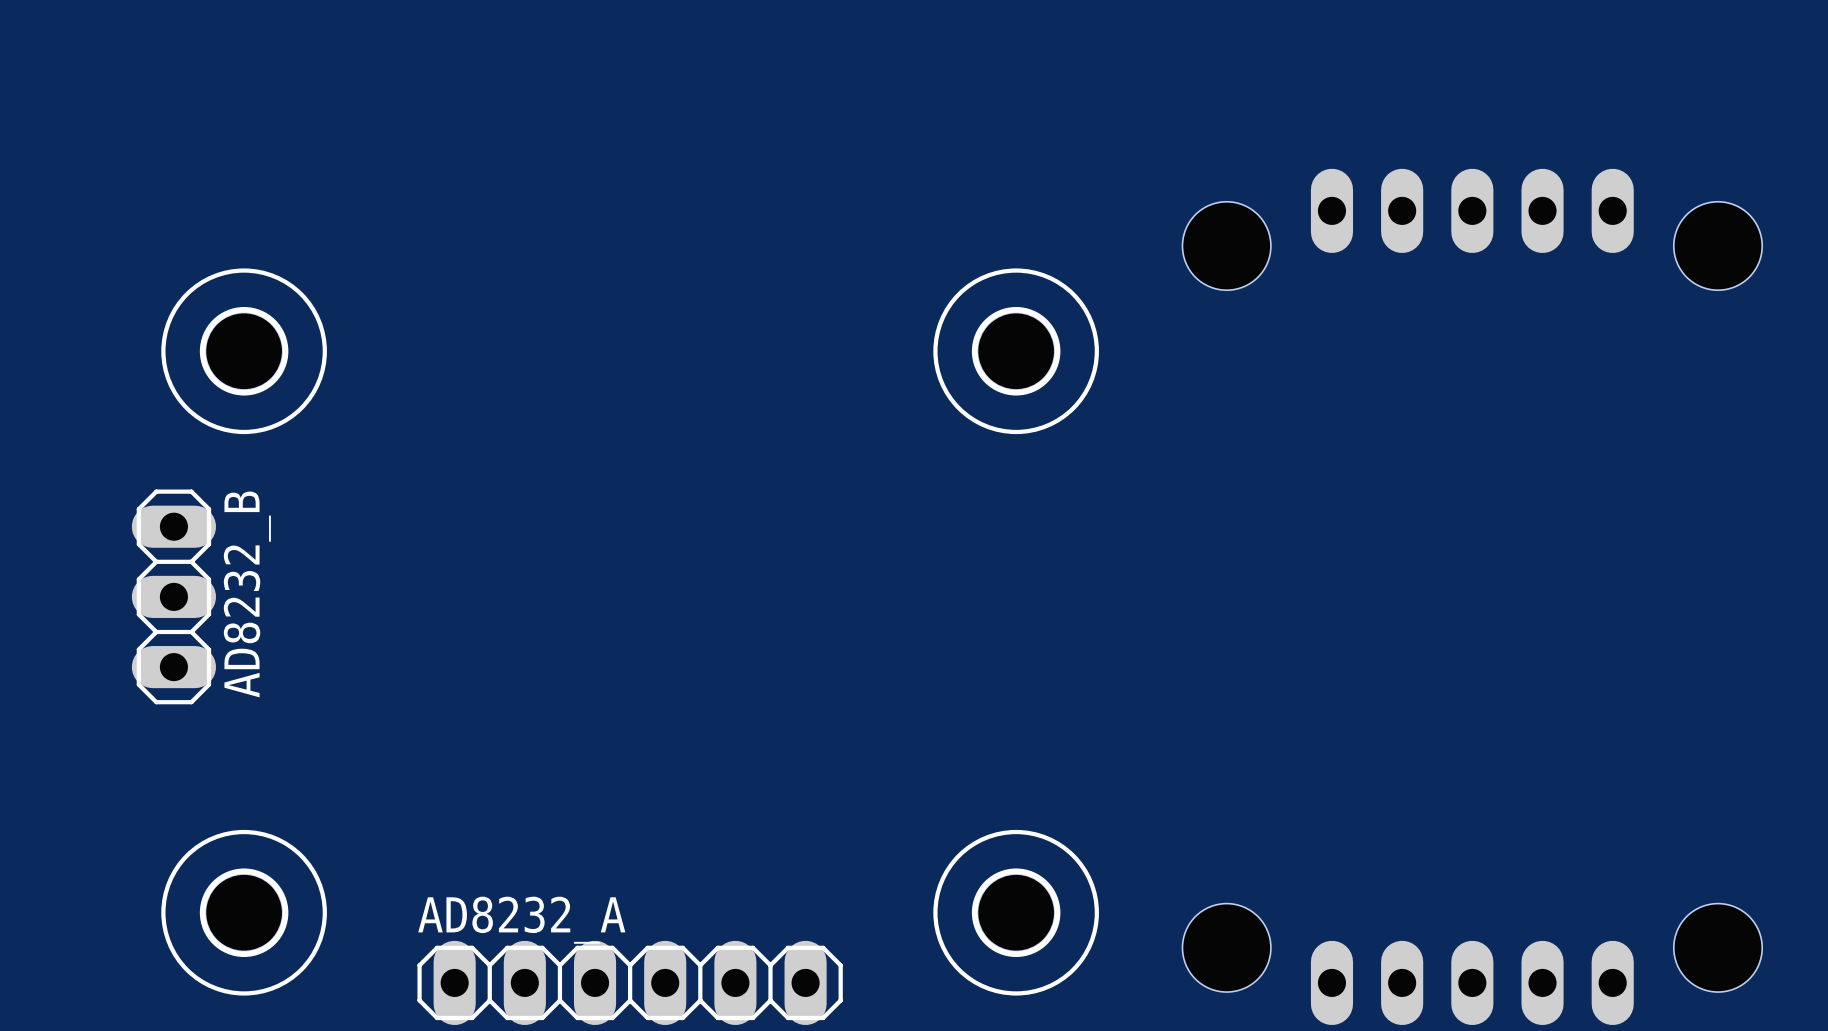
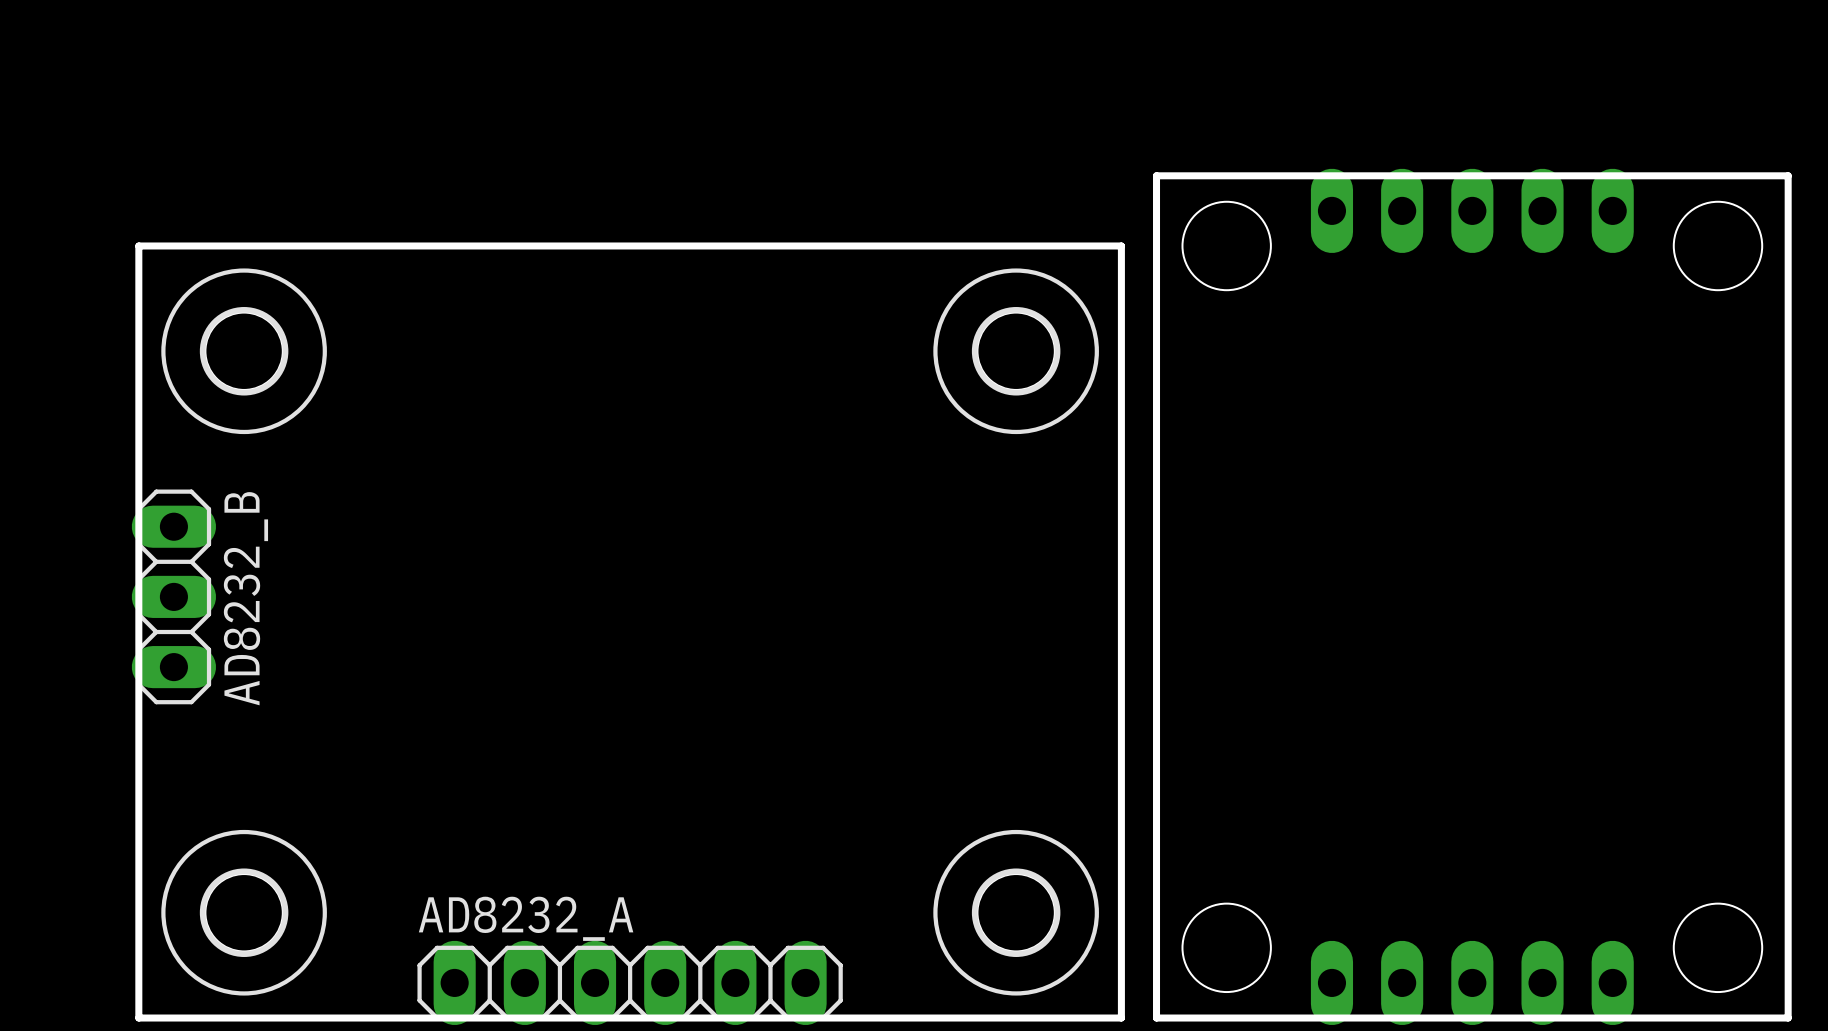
board edge: none -> (1156, 175) (1156, 1018) (1788, 1018) (1788, 175) (1156, 175)
board edge: none -> (138, 245) (1121, 245) (1121, 1018) (138, 1018) (138, 245)

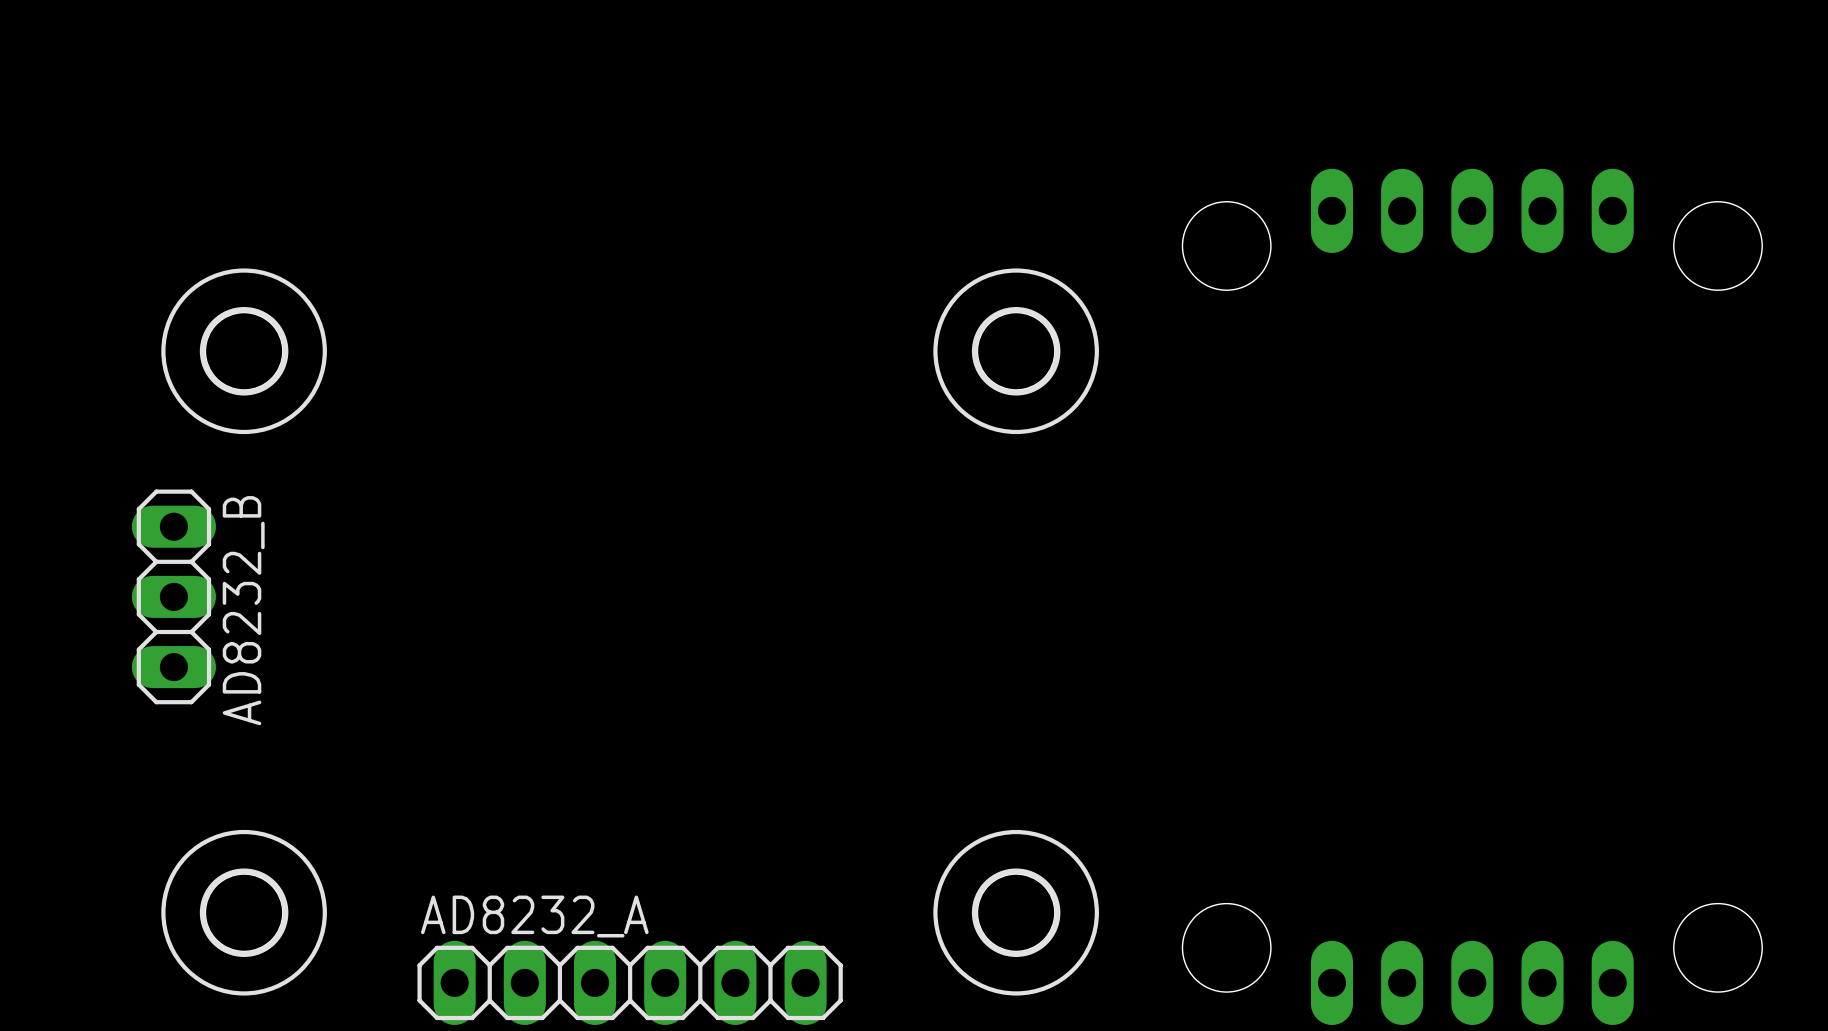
board edge: (1156, 175) (1156, 1018) (1788, 1018) (1788, 175) (1156, 175) -> none
board edge: (138, 245) (1121, 245) (1121, 1018) (138, 1018) (138, 245) -> none

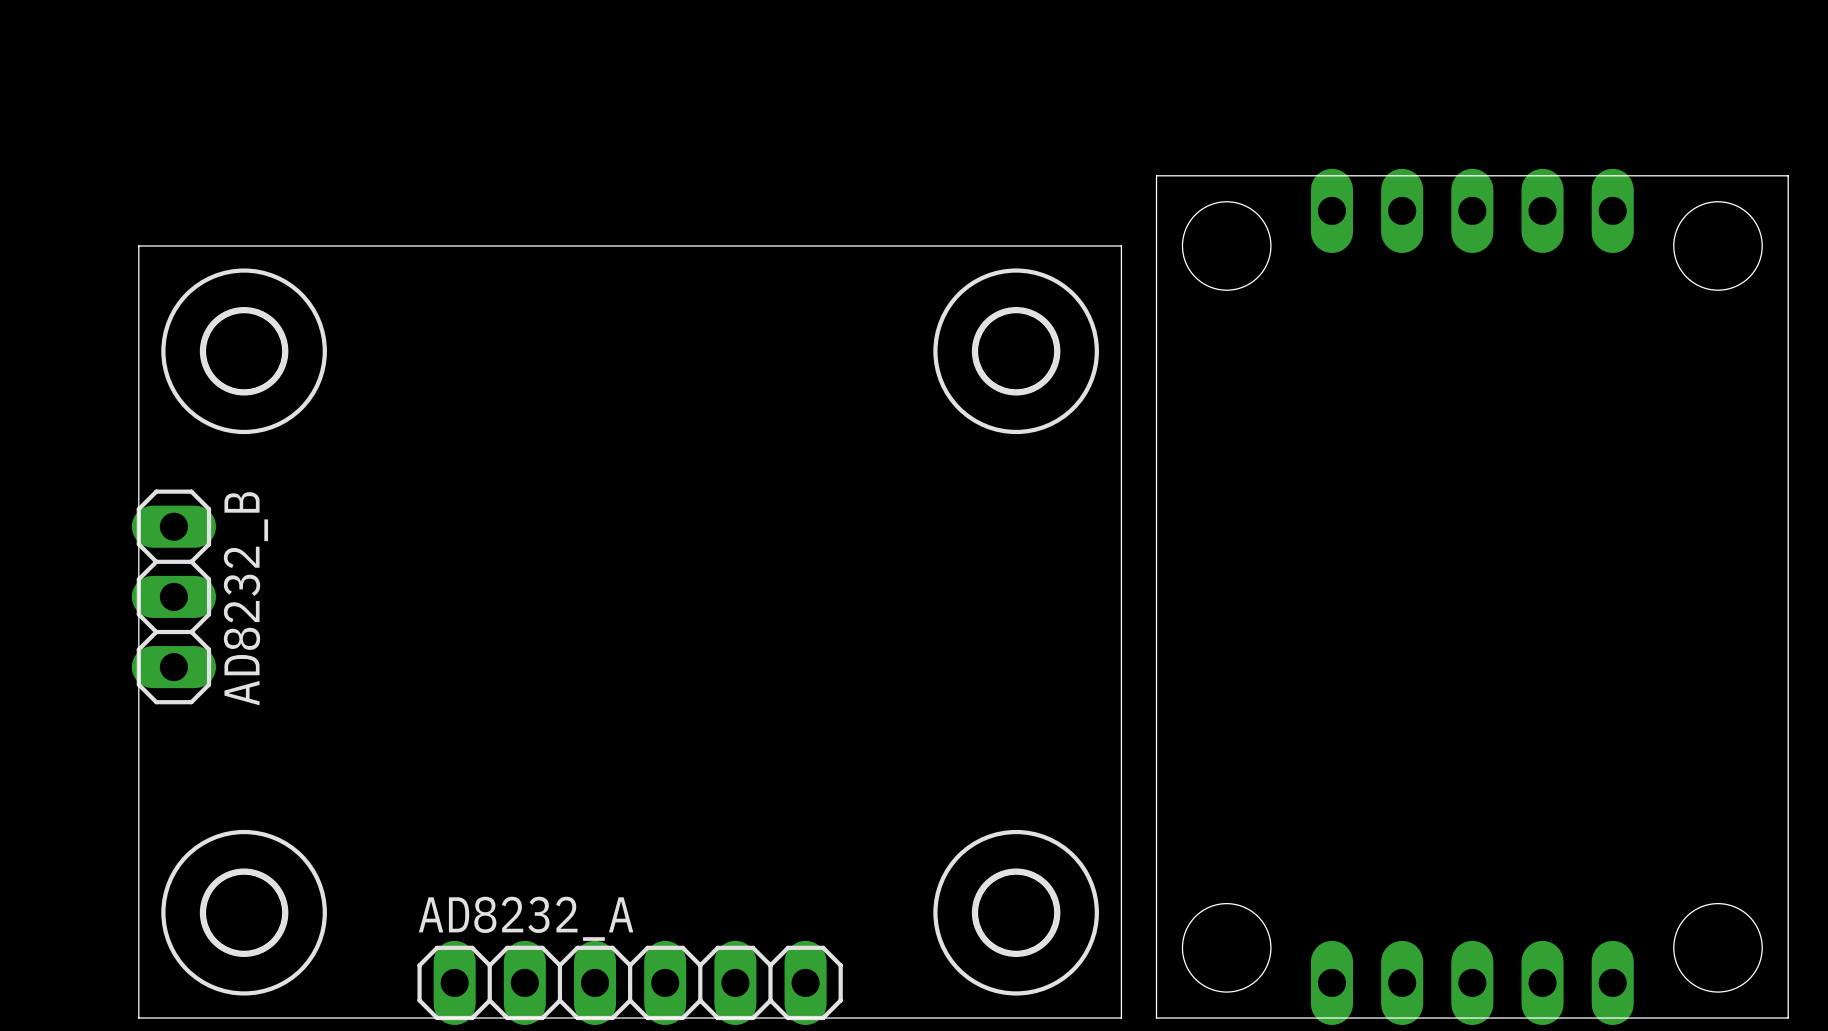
board edge: none -> (1156, 175) (1156, 1018) (1788, 1018) (1788, 175) (1156, 175)
board edge: none -> (138, 245) (1121, 245) (1121, 1018) (138, 1018) (138, 245)

